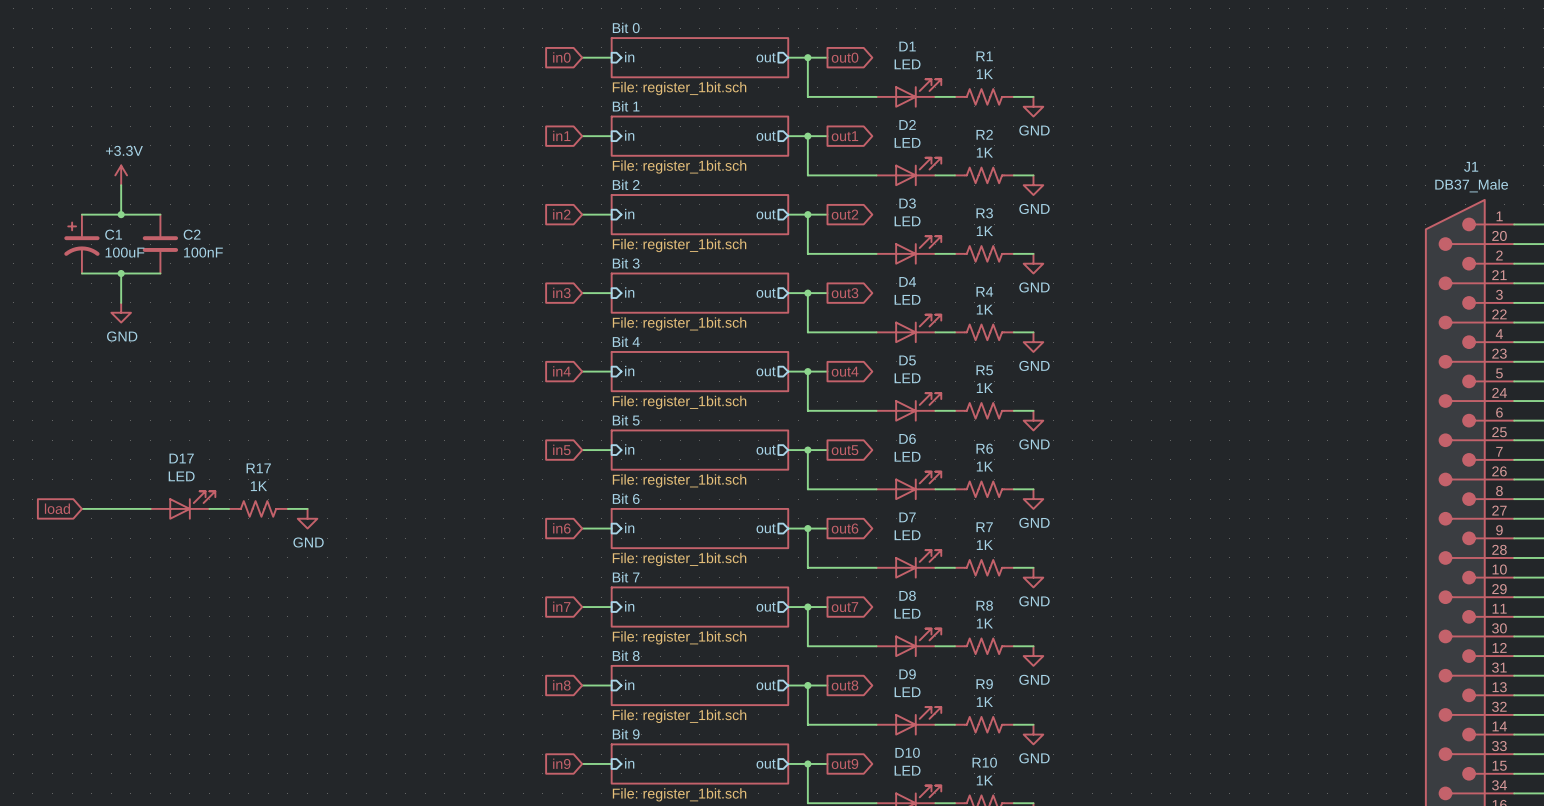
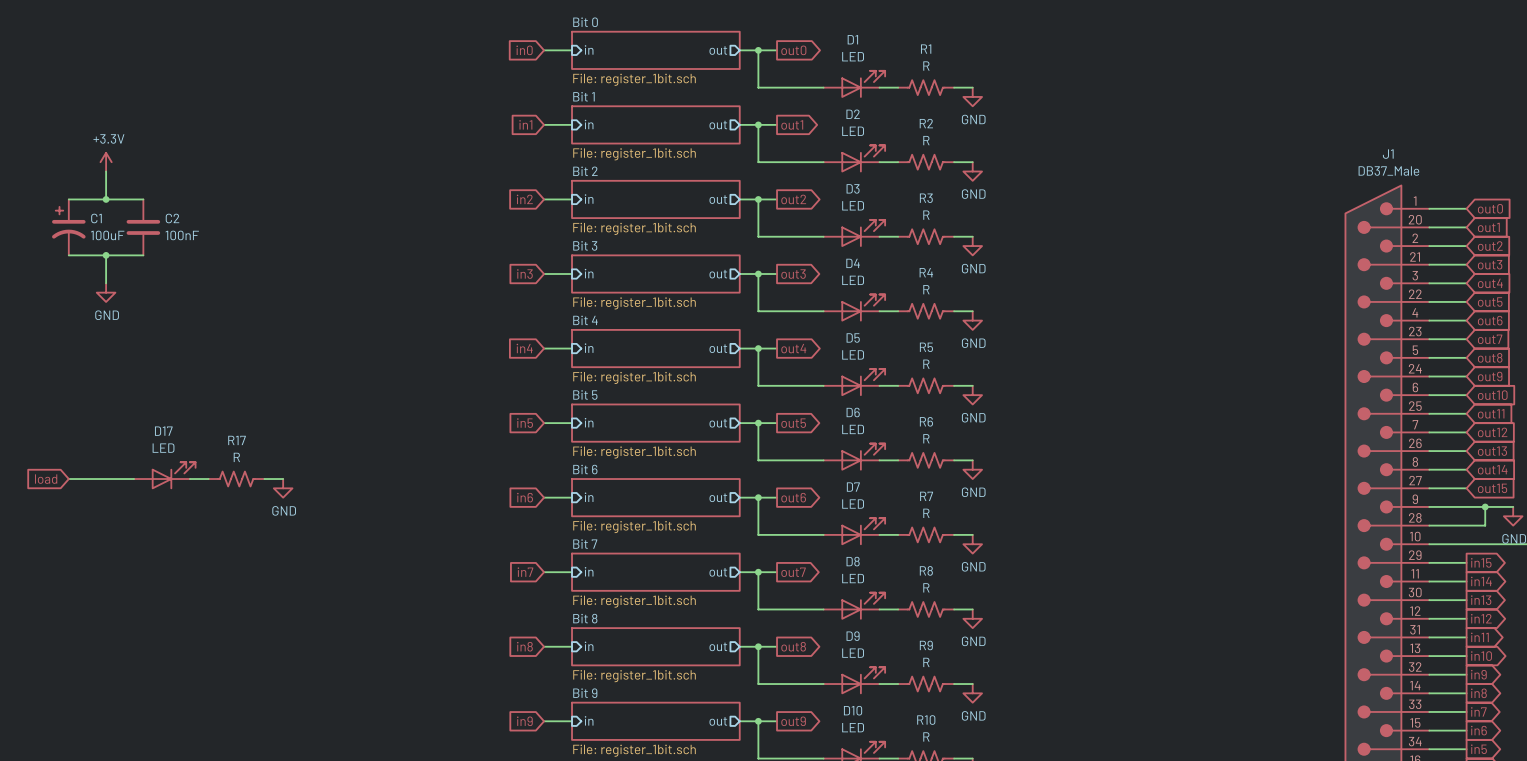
R1 value: 1K (984, 74) -> R (926, 66)
R2 value: 1K (984, 152) -> R (926, 140)
R3 value: 1K (984, 231) -> R (926, 215)
R4 value: 1K (984, 309) -> R (926, 289)
R5 value: 1K (984, 388) -> R (926, 364)
R6 value: 1K (984, 466) -> R (926, 438)
R17 value: 1K (258, 486) -> R (236, 457)
R7 value: 1K (984, 545) -> R (926, 513)
R8 value: 1K (984, 623) -> R (926, 587)
R9 value: 1K (984, 702) -> R (926, 662)
R10 value: 1K (984, 780) -> R (926, 736)

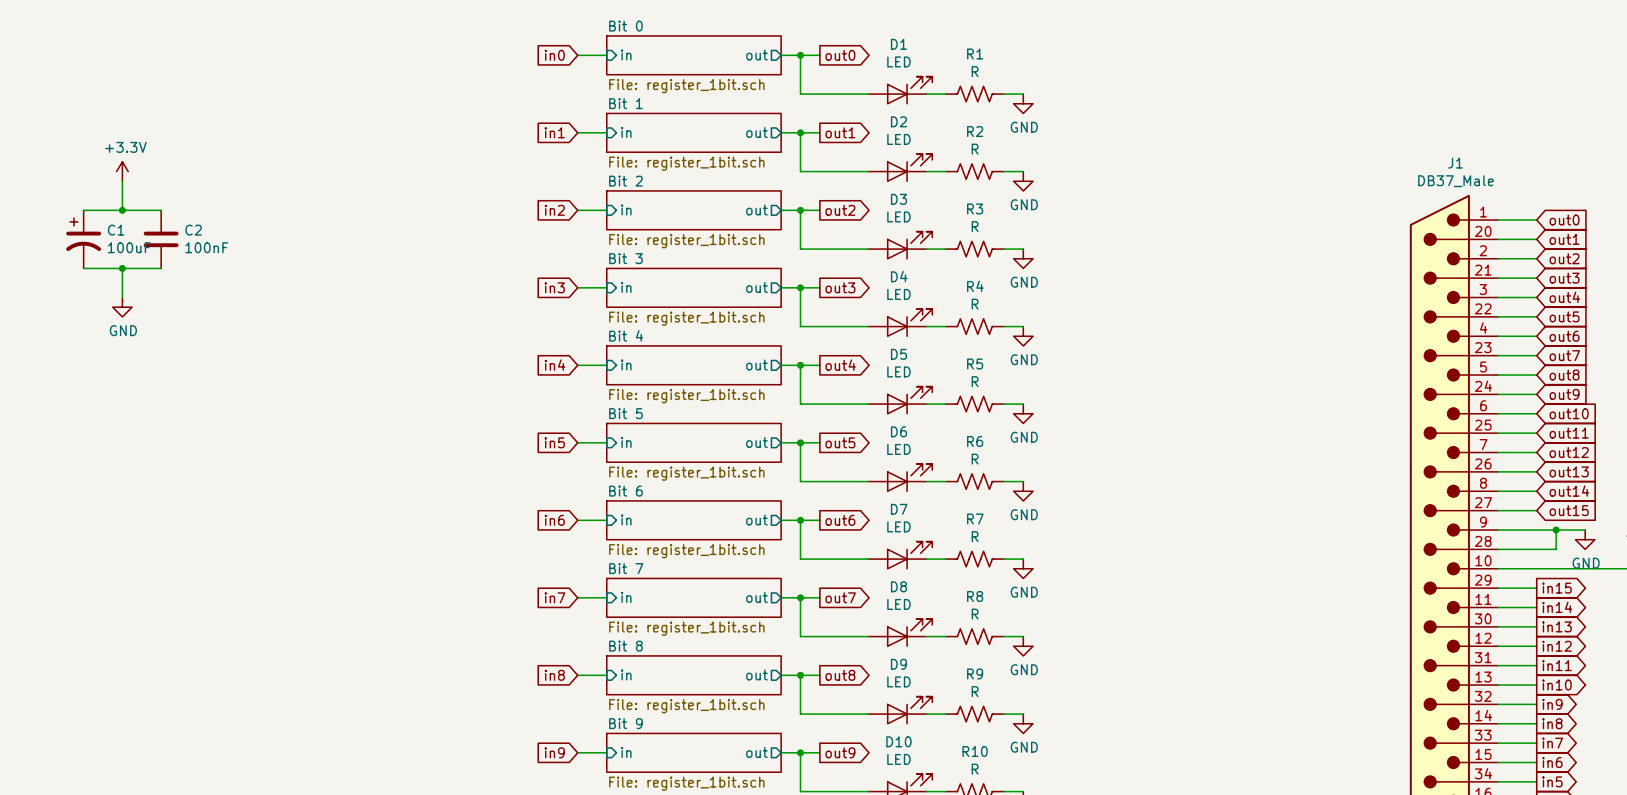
D17: LED (164, 475) -> none
global label: load (46, 479) -> none
wire: (68, 479) (134, 479) -> none
wire: (189, 479) (208, 479) -> none
R17: R (236, 479) -> none
wire: (264, 479) (283, 479) -> none
power symbol: GND (283, 488) -> none

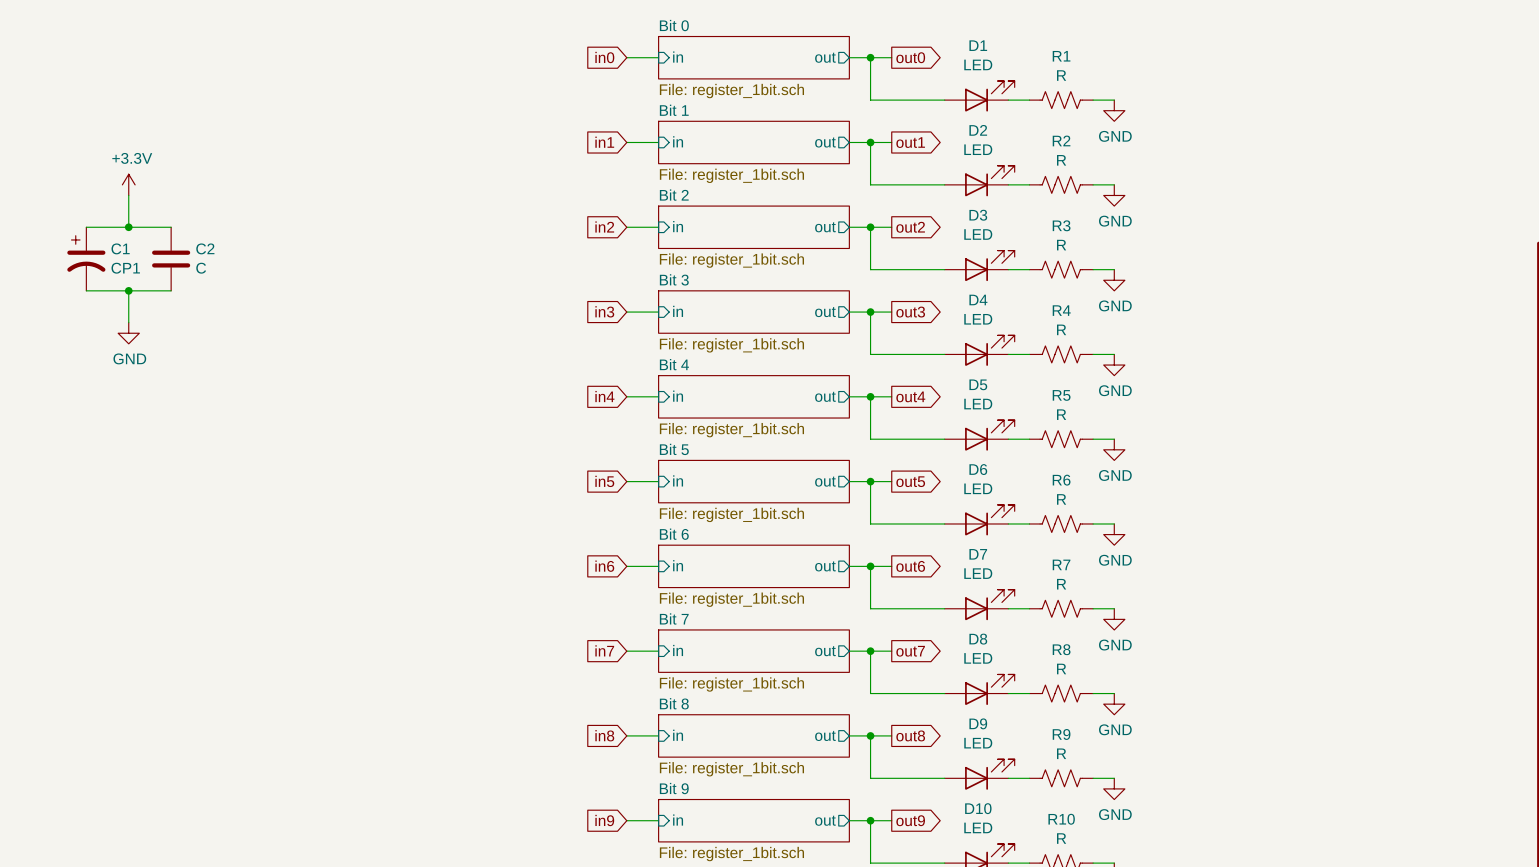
C1 value: 100uF (129, 247) -> CP1 (125, 268)
C2 value: 100nF (206, 247) -> C (201, 268)

